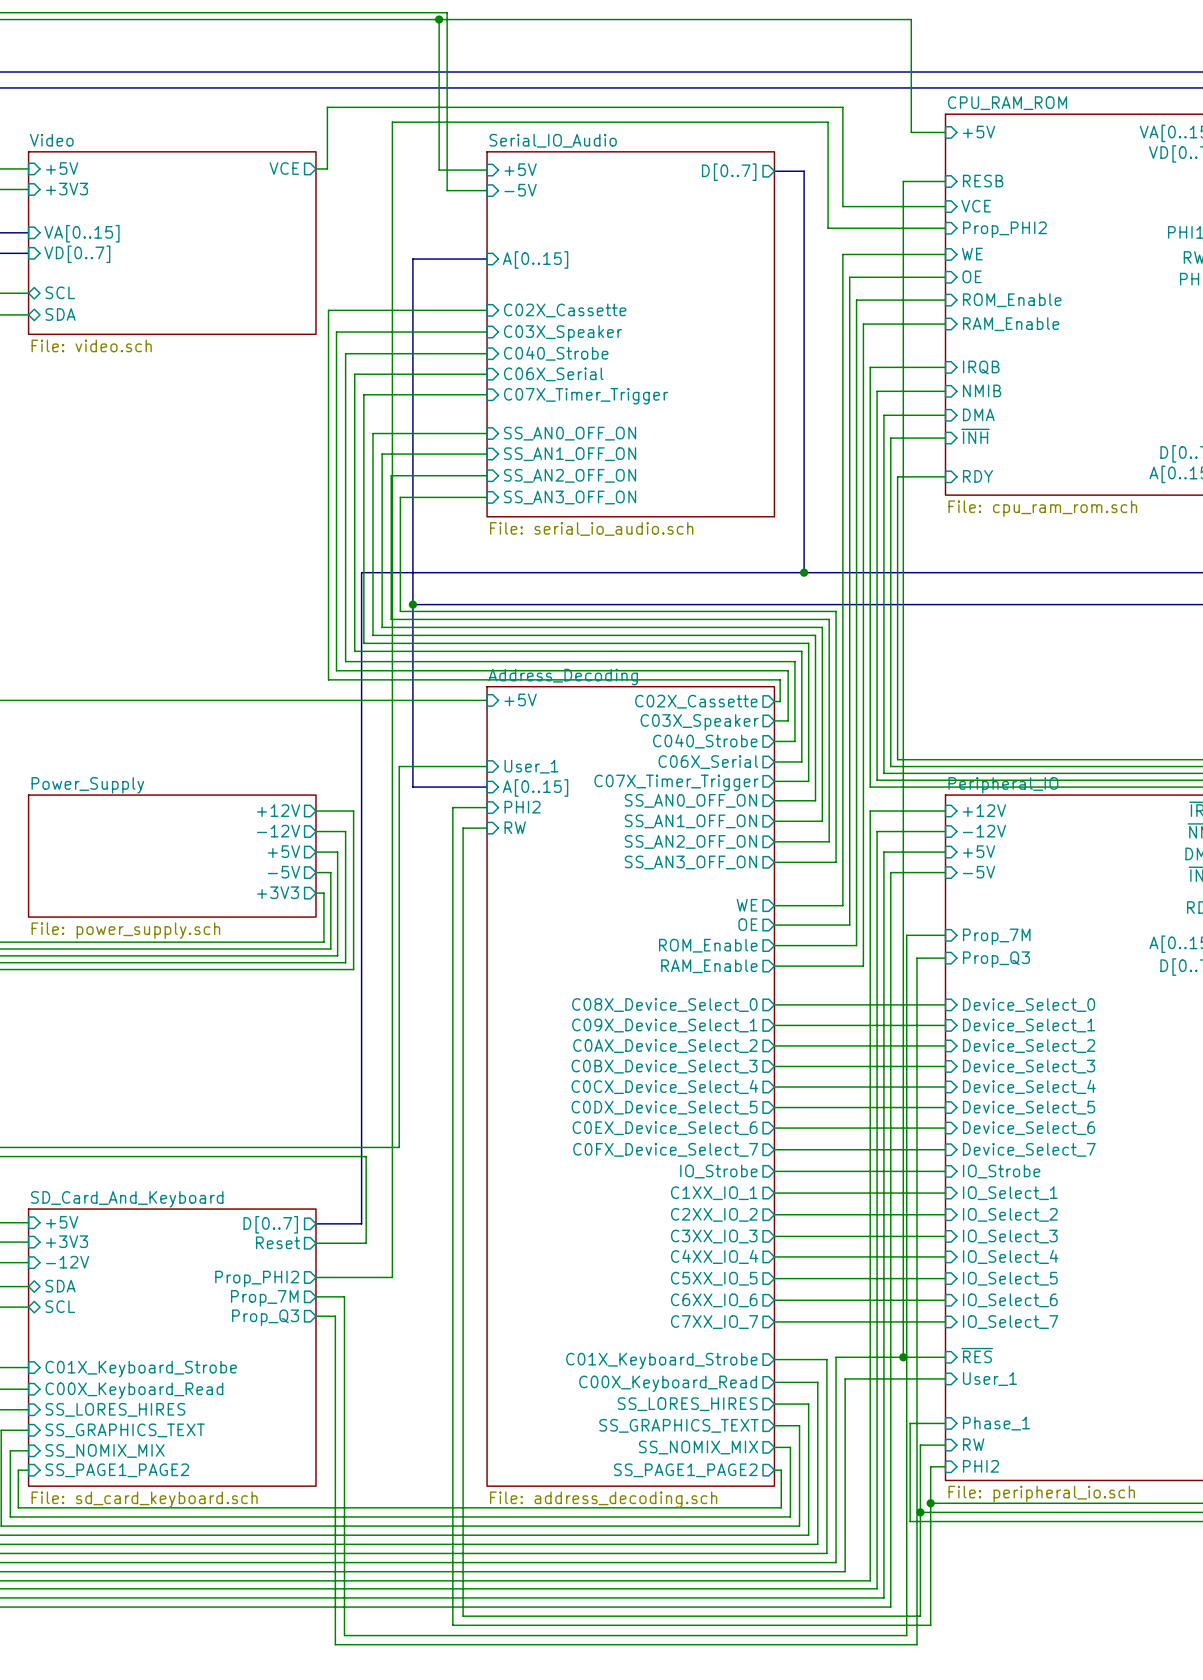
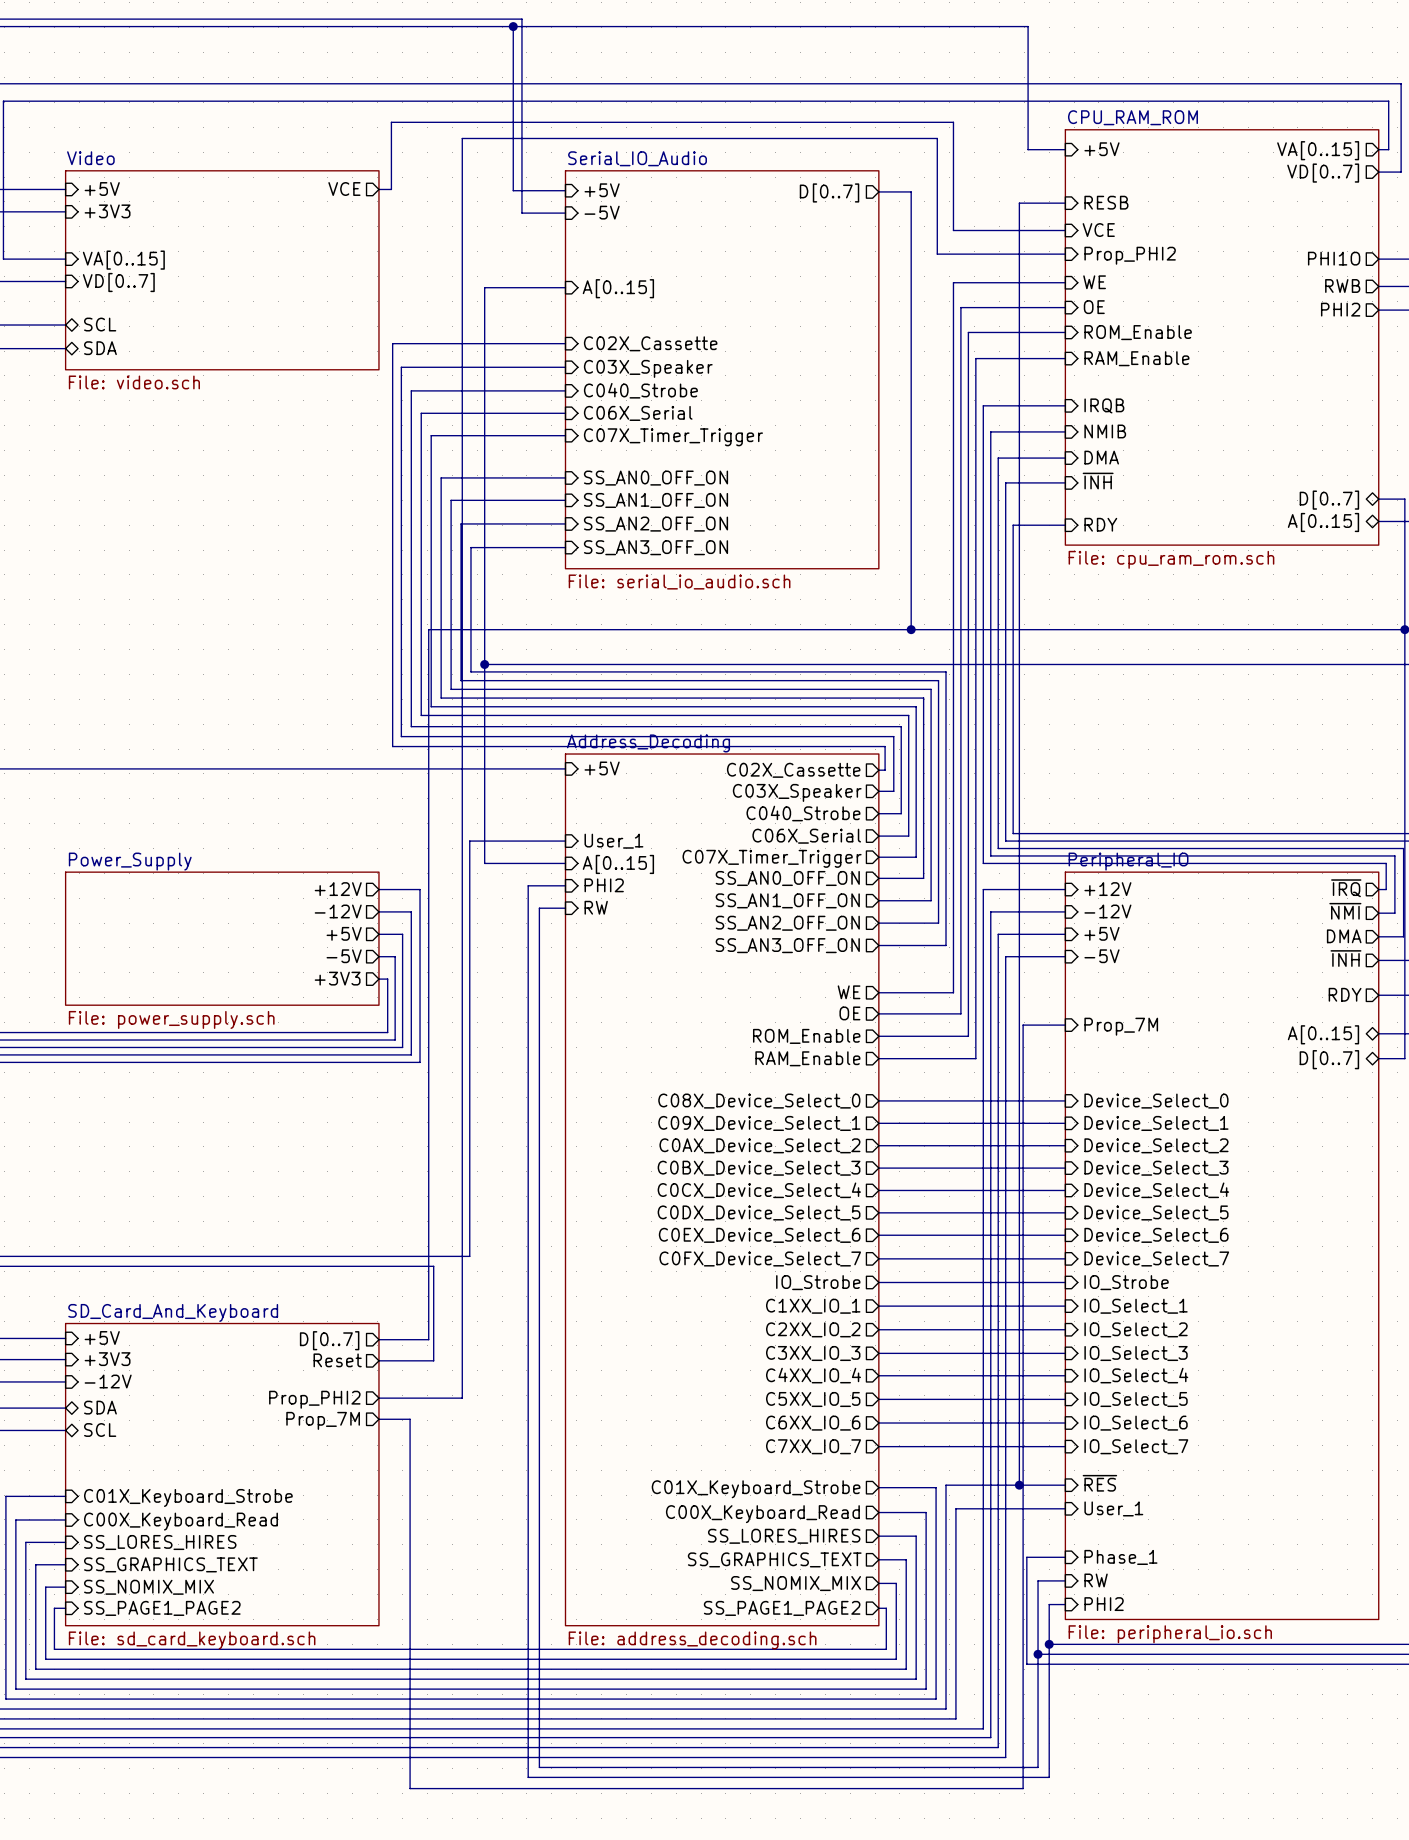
wire: (945, 958) (917, 958) (917, 1644) (335, 1644) (335, 1316) (315, 1316) -> none
sheet pin: Prop_Q3 (996, 959) -> none
sheet pin: Prop_Q3 (265, 1317) -> none

